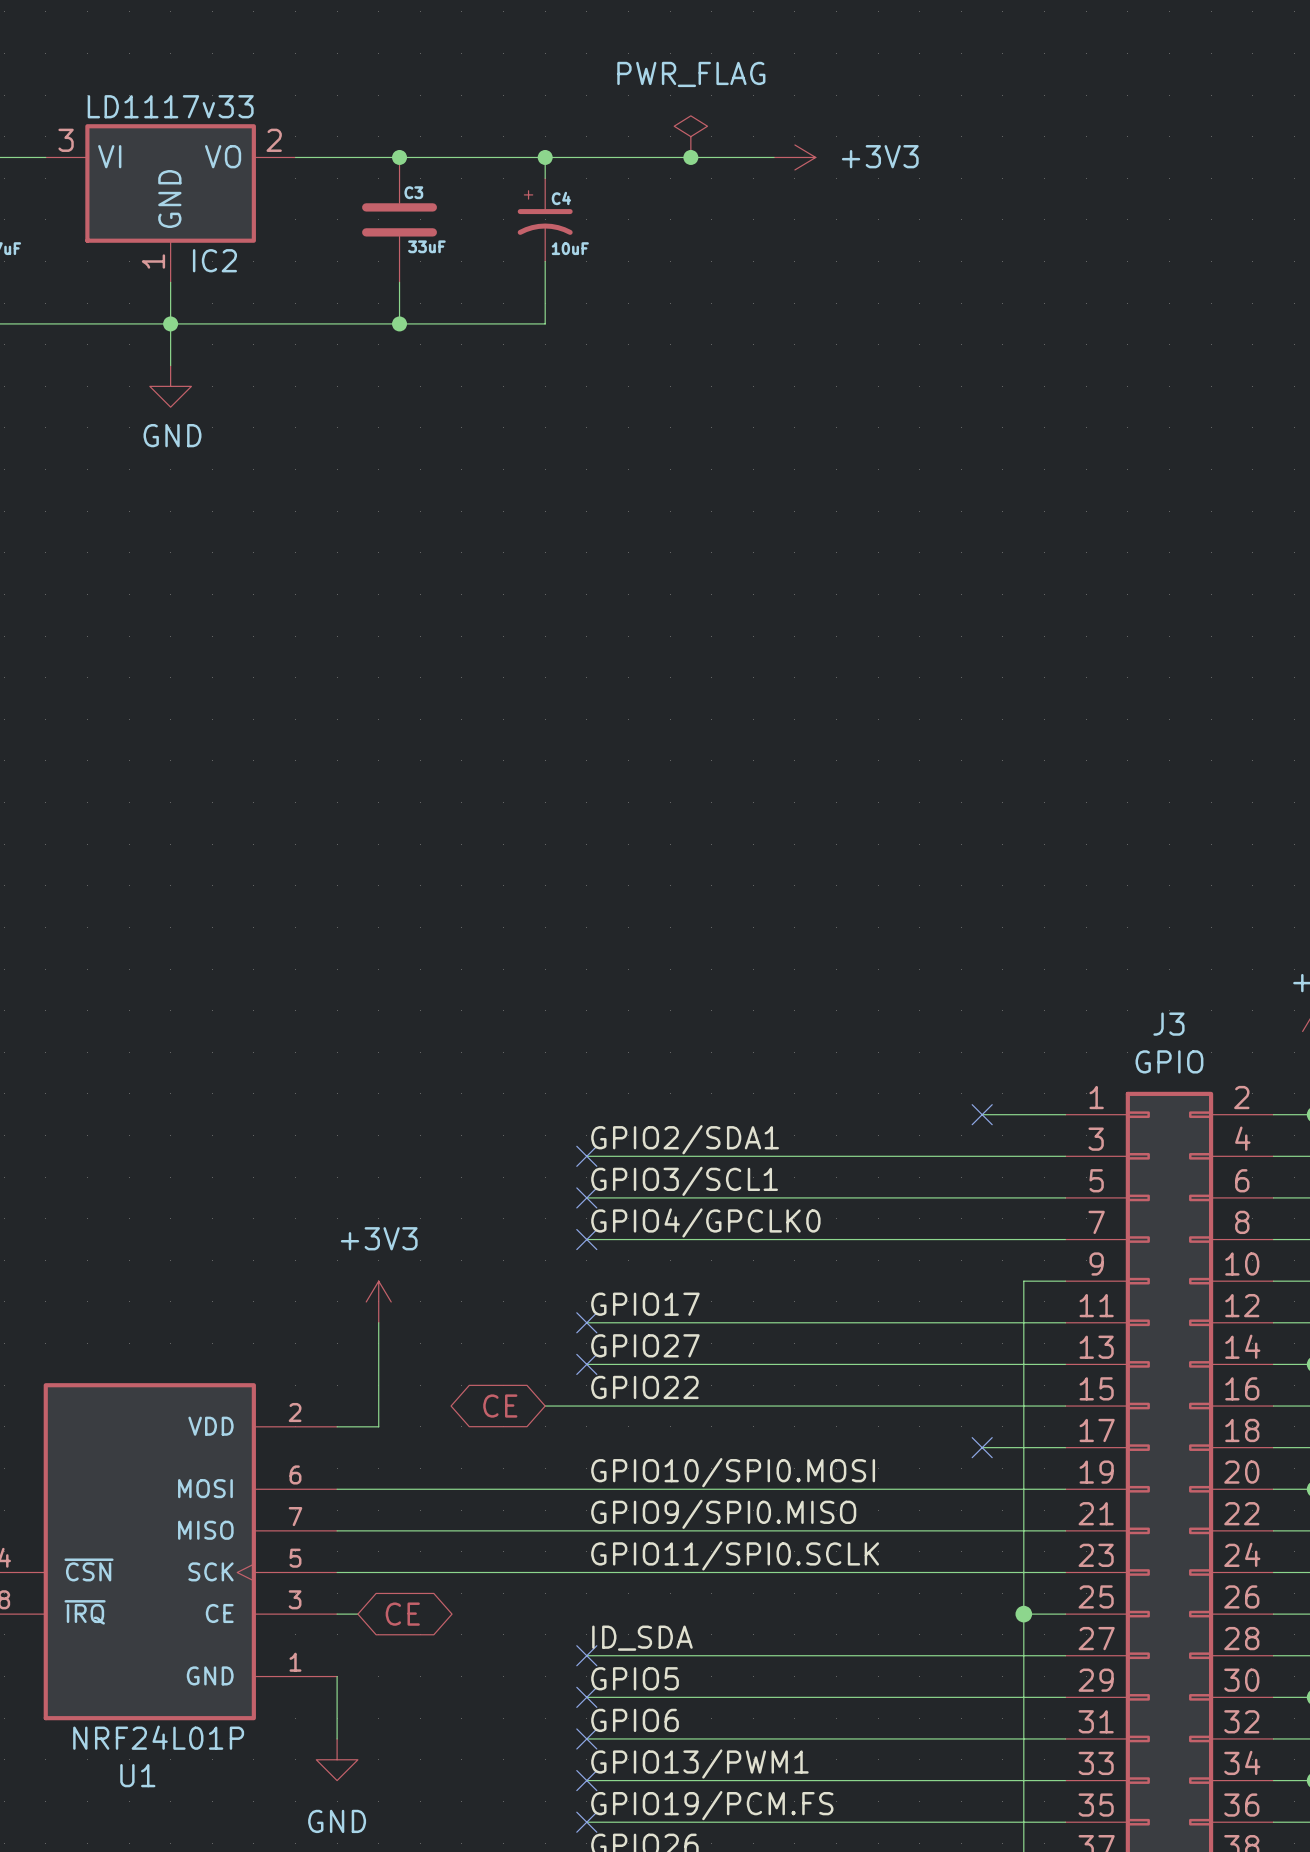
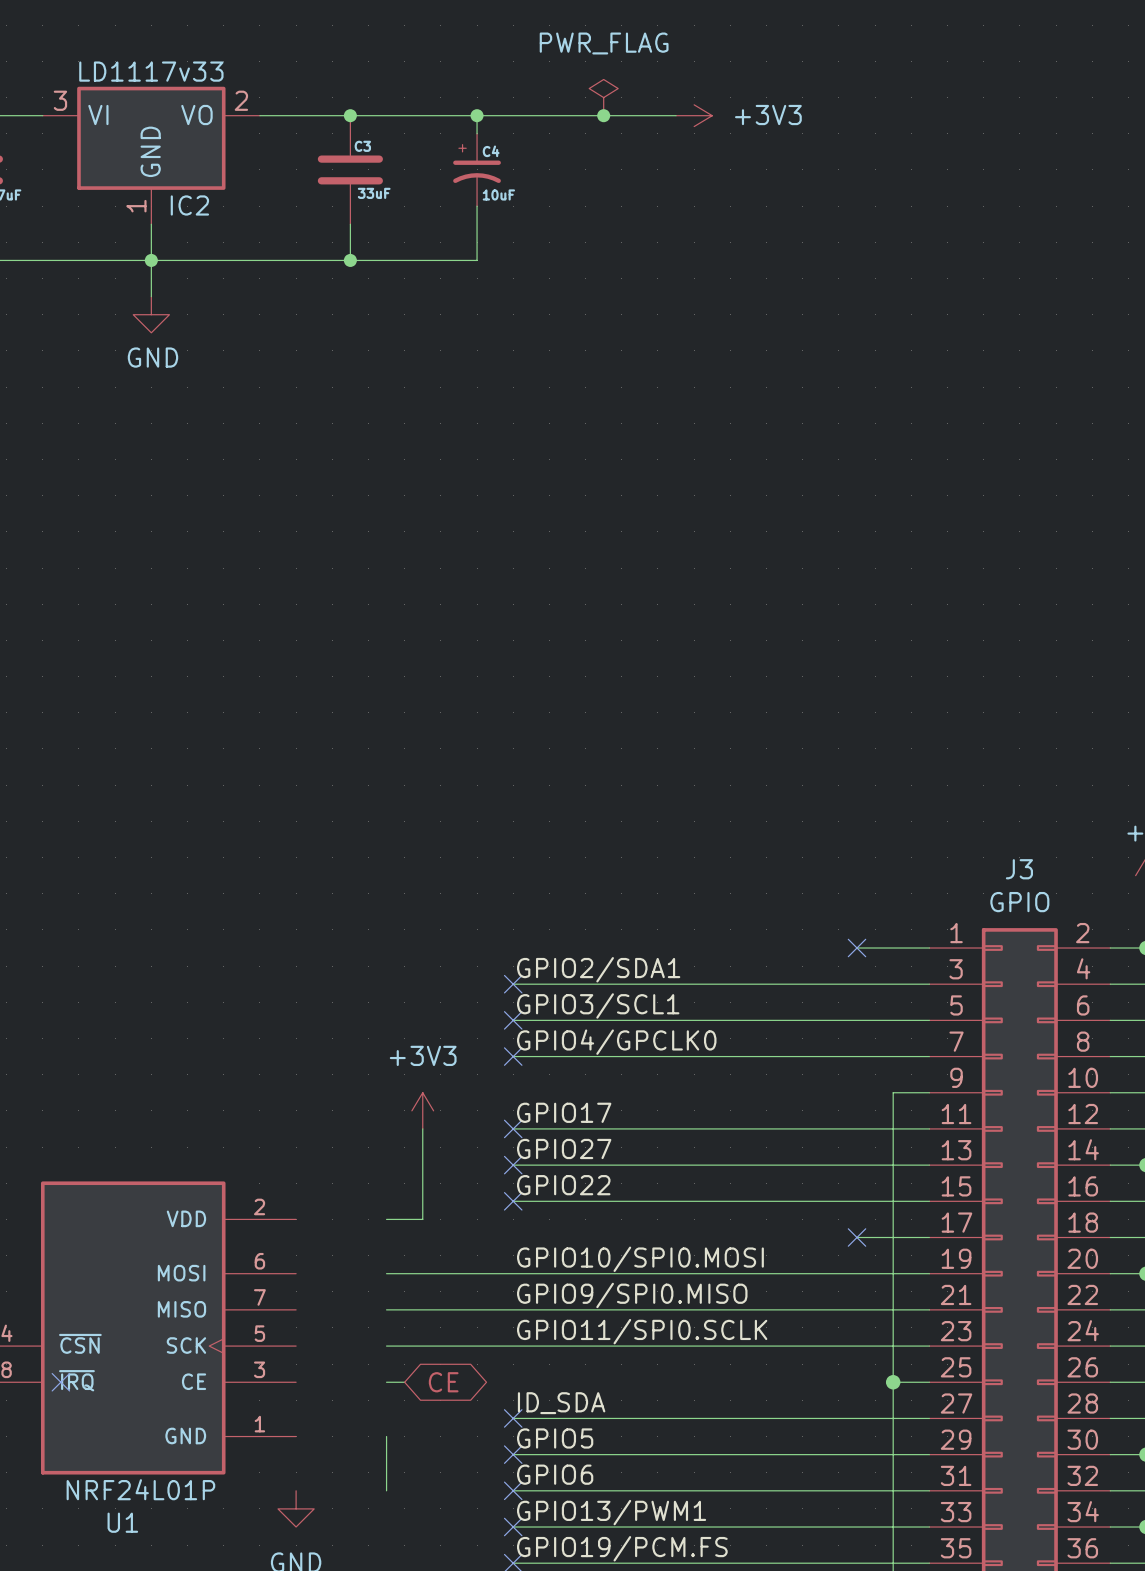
power symbol position: +3V3 (378, 1301) -> +3V3 (422, 1110)
wire: (378, 1322) (378, 1426) (337, 1426) -> (422, 1128) (422, 1219) (386, 1219)
global label: CE (500, 1406) -> none
wire: (545, 1406) (586, 1406) -> none
no-connect mark: none -> (513, 1201)
wire: (337, 1489) (441, 1489) -> none
wire: (337, 1530) (441, 1530) -> none
wire: (337, 1572) (441, 1572) -> none
no-connect mark: none -> (60, 1382)
wire: (337, 1614) (357, 1614) -> (386, 1382) (404, 1382)
global label position: CE (402, 1614) -> CE (443, 1382)
wire: (337, 1676) (337, 1738) -> (386, 1436) (386, 1490)

